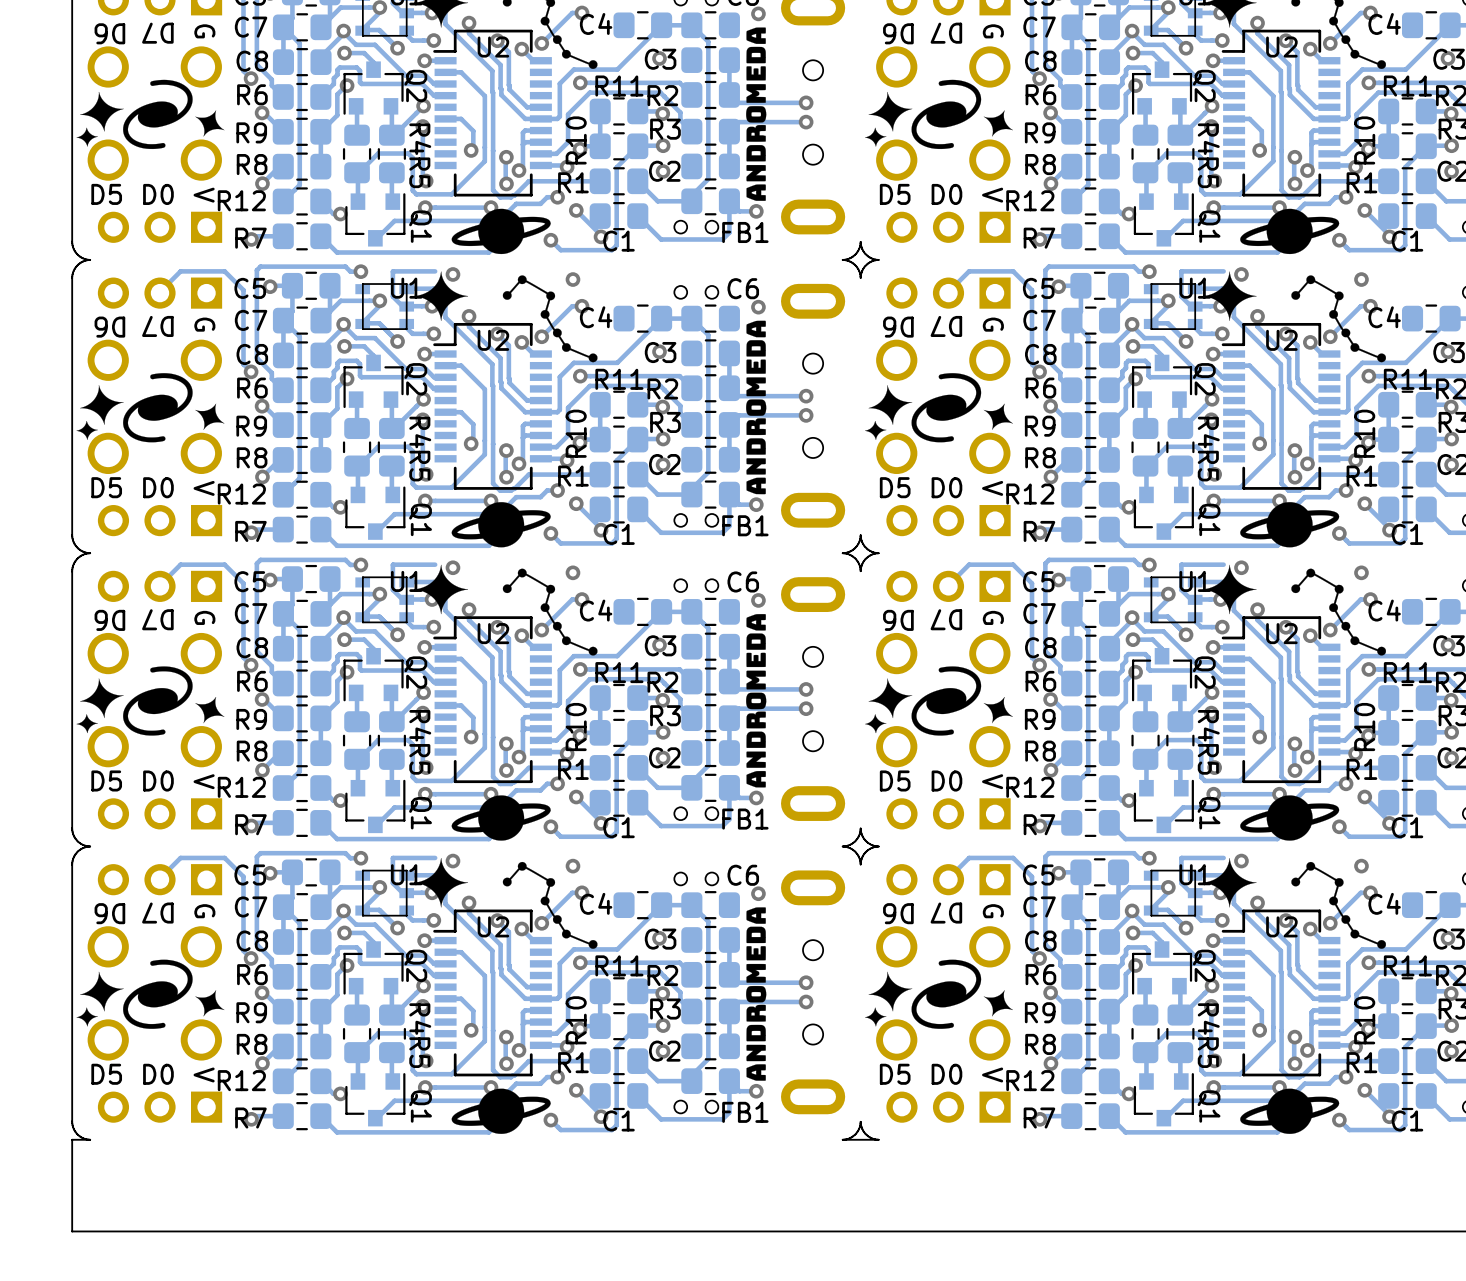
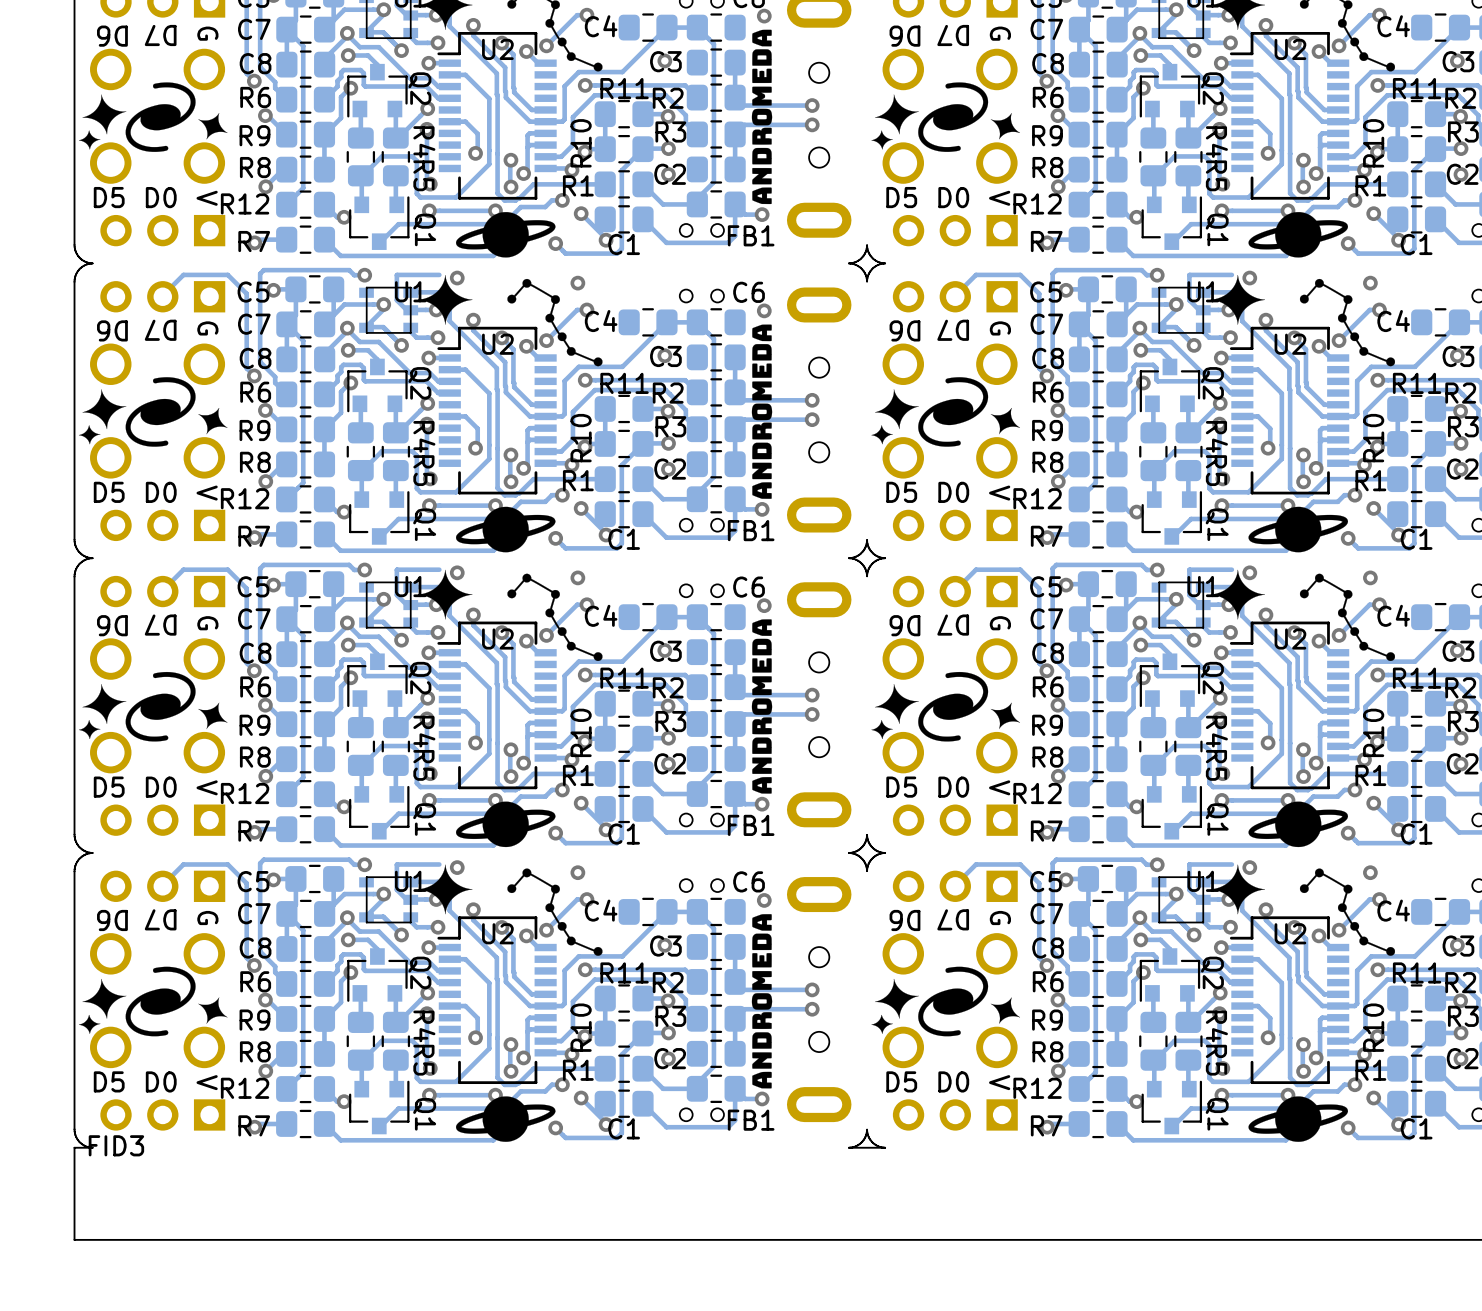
FID3: none -> (115, 1114)

